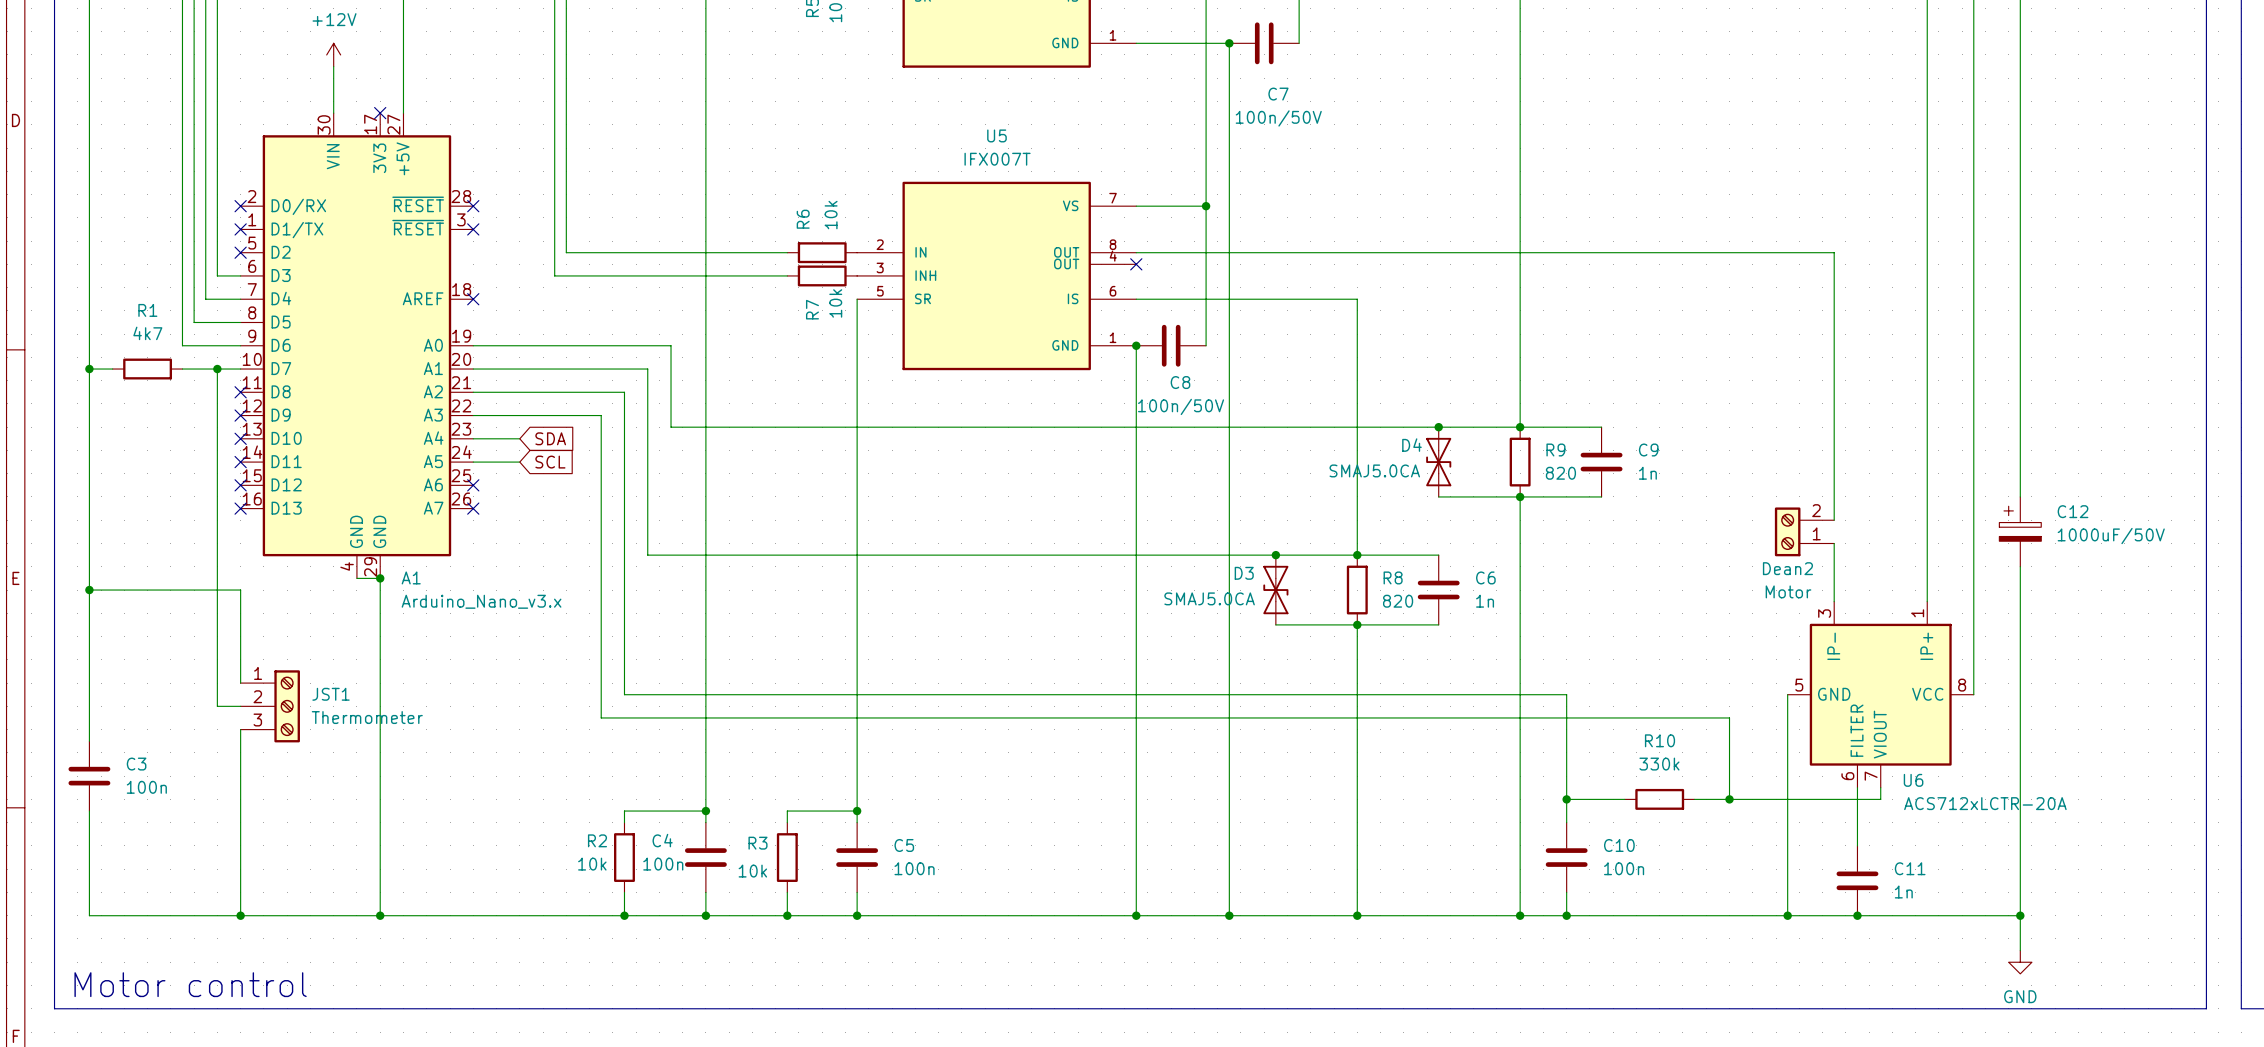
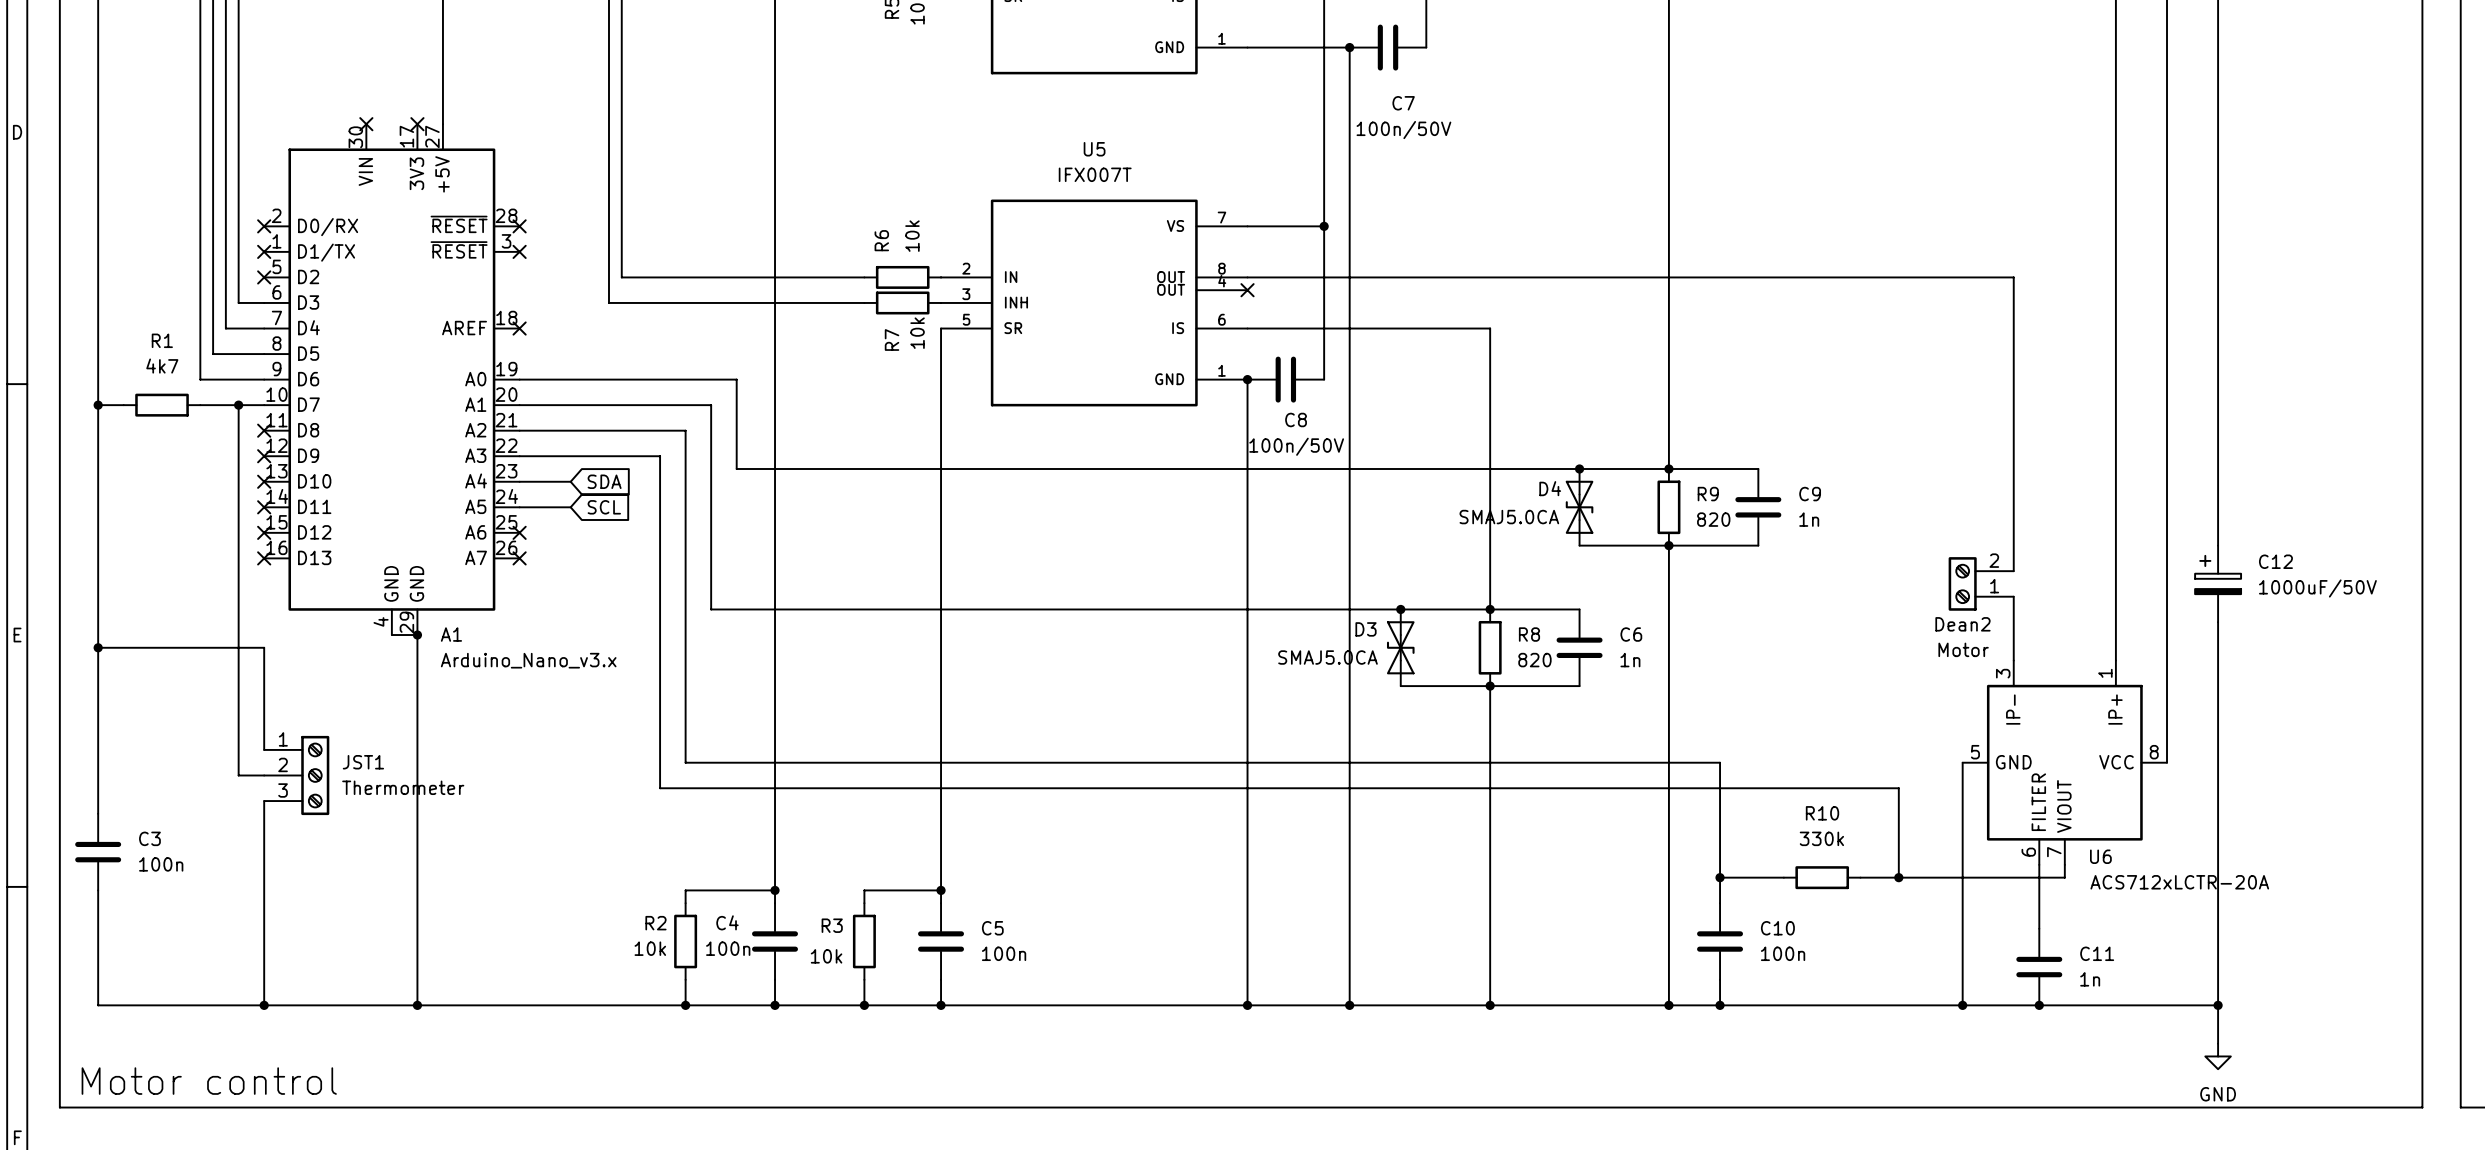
power symbol: +12V (333, 54) -> none
wire: (333, 66) (333, 113) -> none
no-connect mark: none -> (366, 124)

